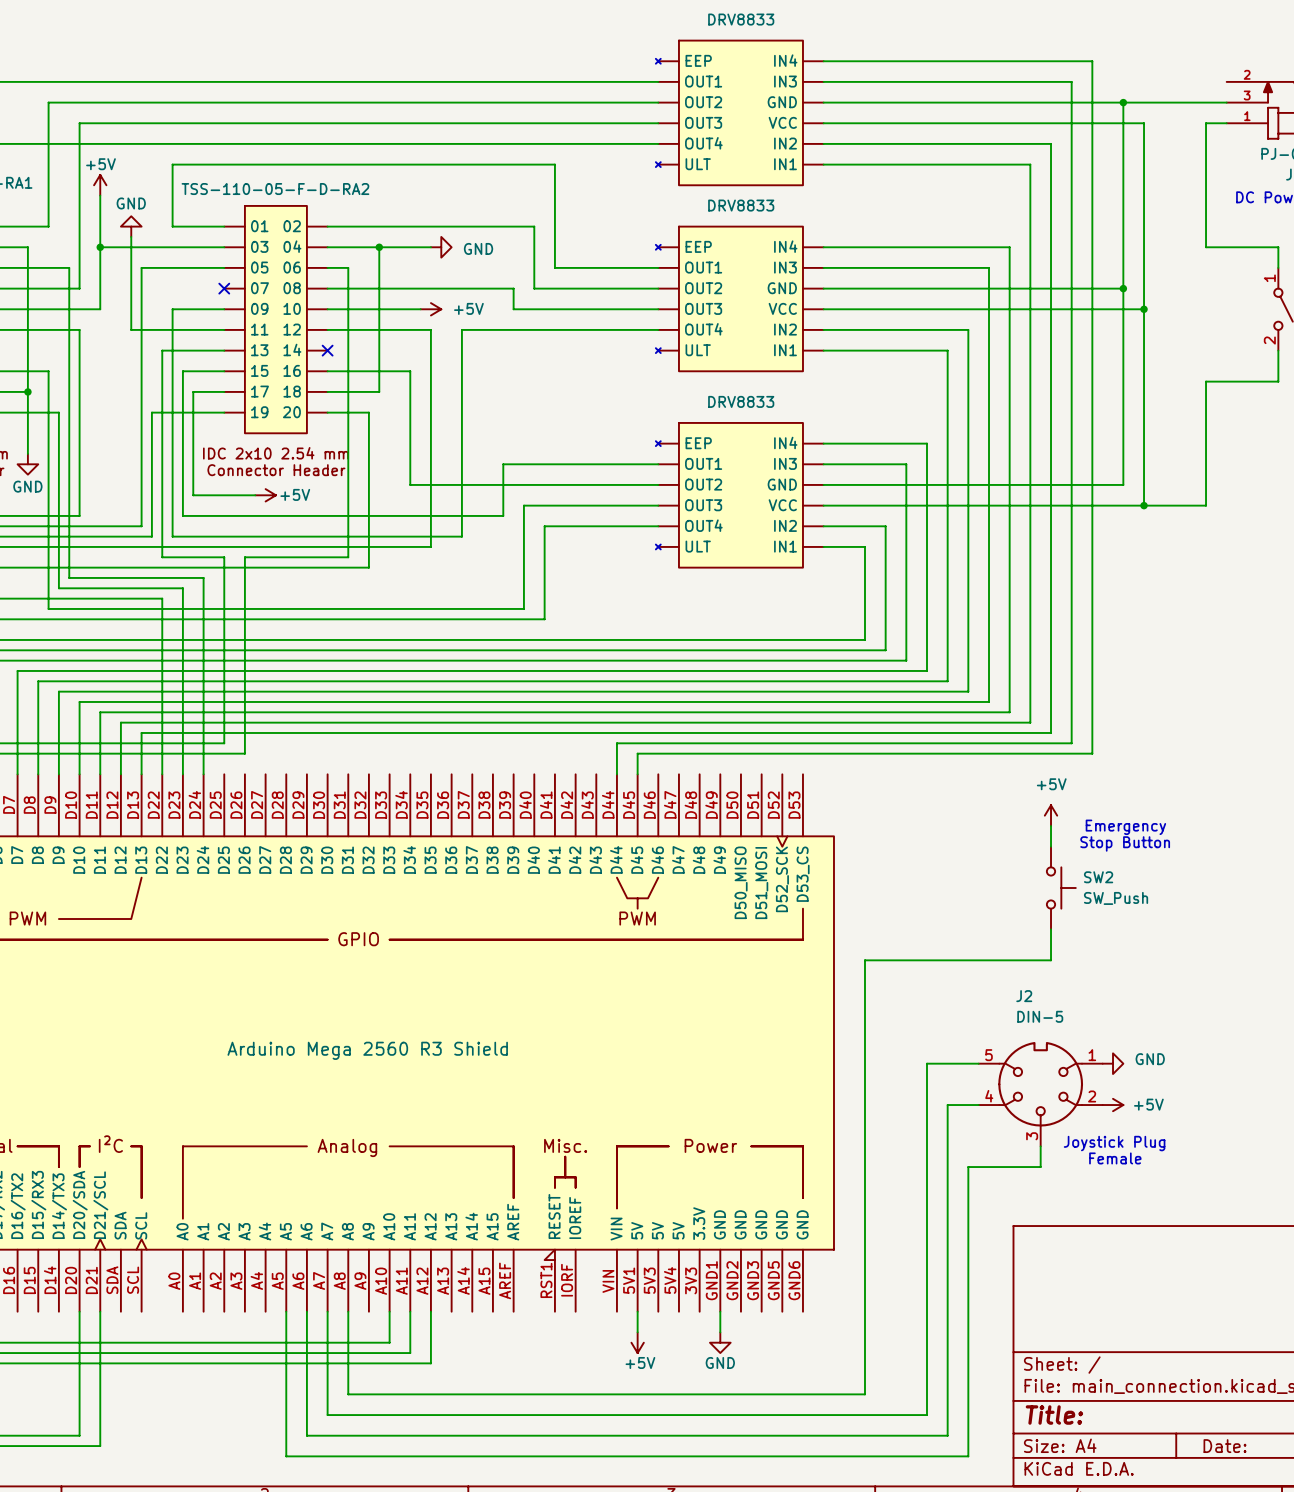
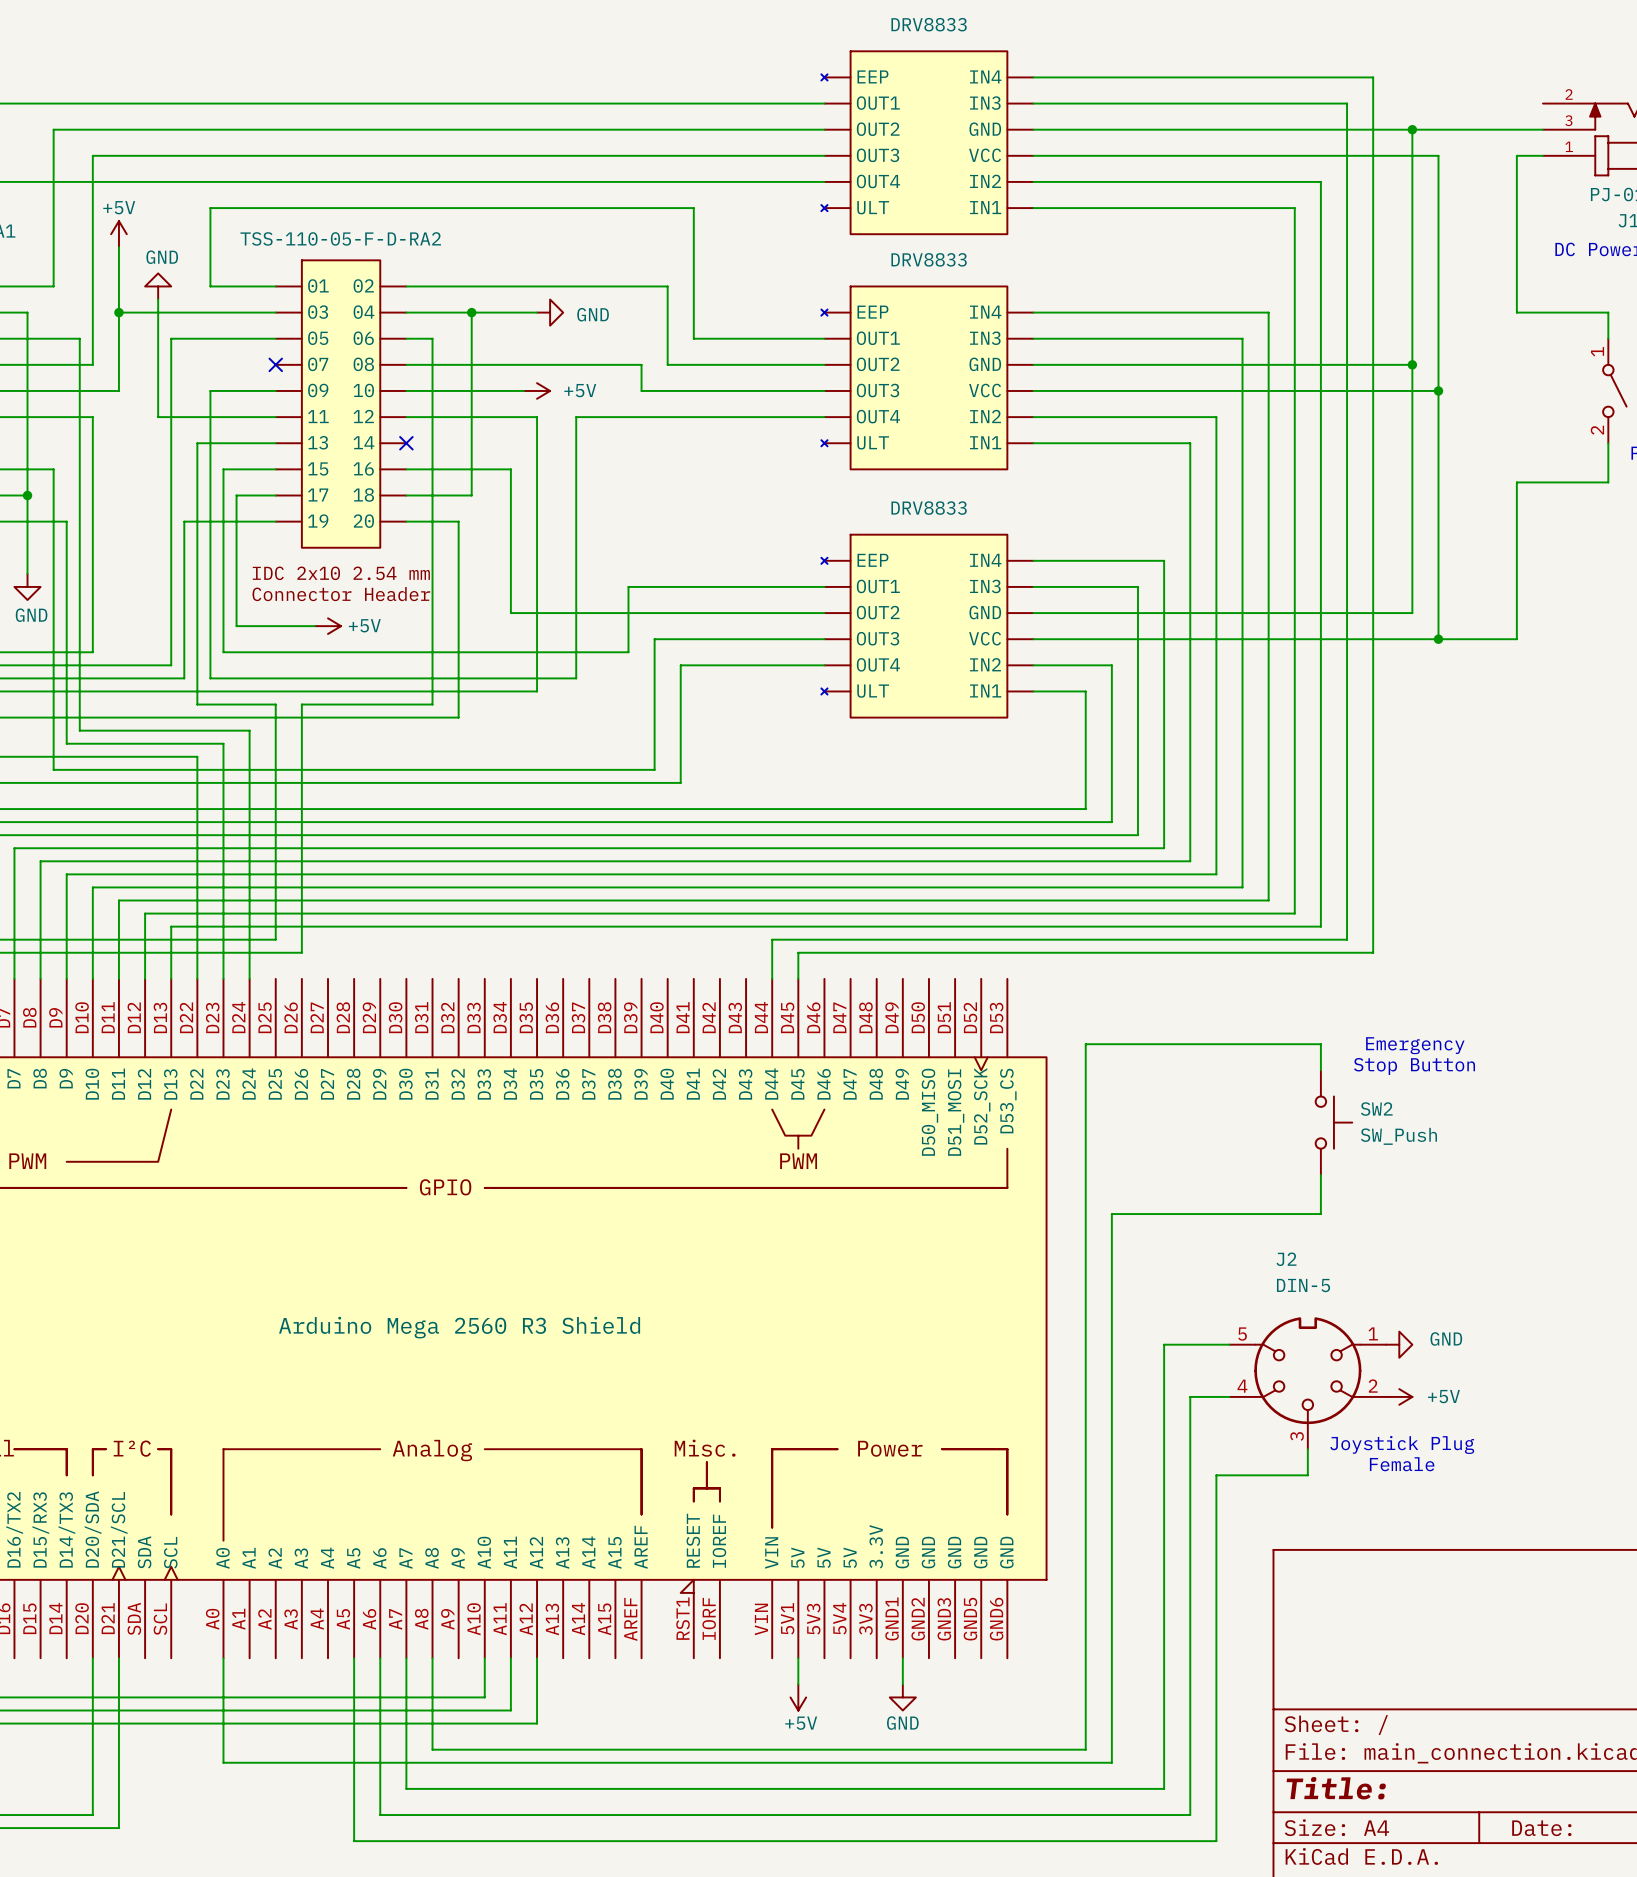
power symbol: +5V (1051, 815) -> none
wire: (864, 960) (885, 960) -> (1085, 1214) (1085, 1044) (1320, 1044)
wire: (348, 1384) (348, 1394) -> (223, 1658) (223, 1762) (432, 1762)
wire: none -> (432, 1749) (1085, 1749)
wire: (864, 1384) (864, 1394) -> (1111, 1214) (1111, 1762) (1085, 1762)

